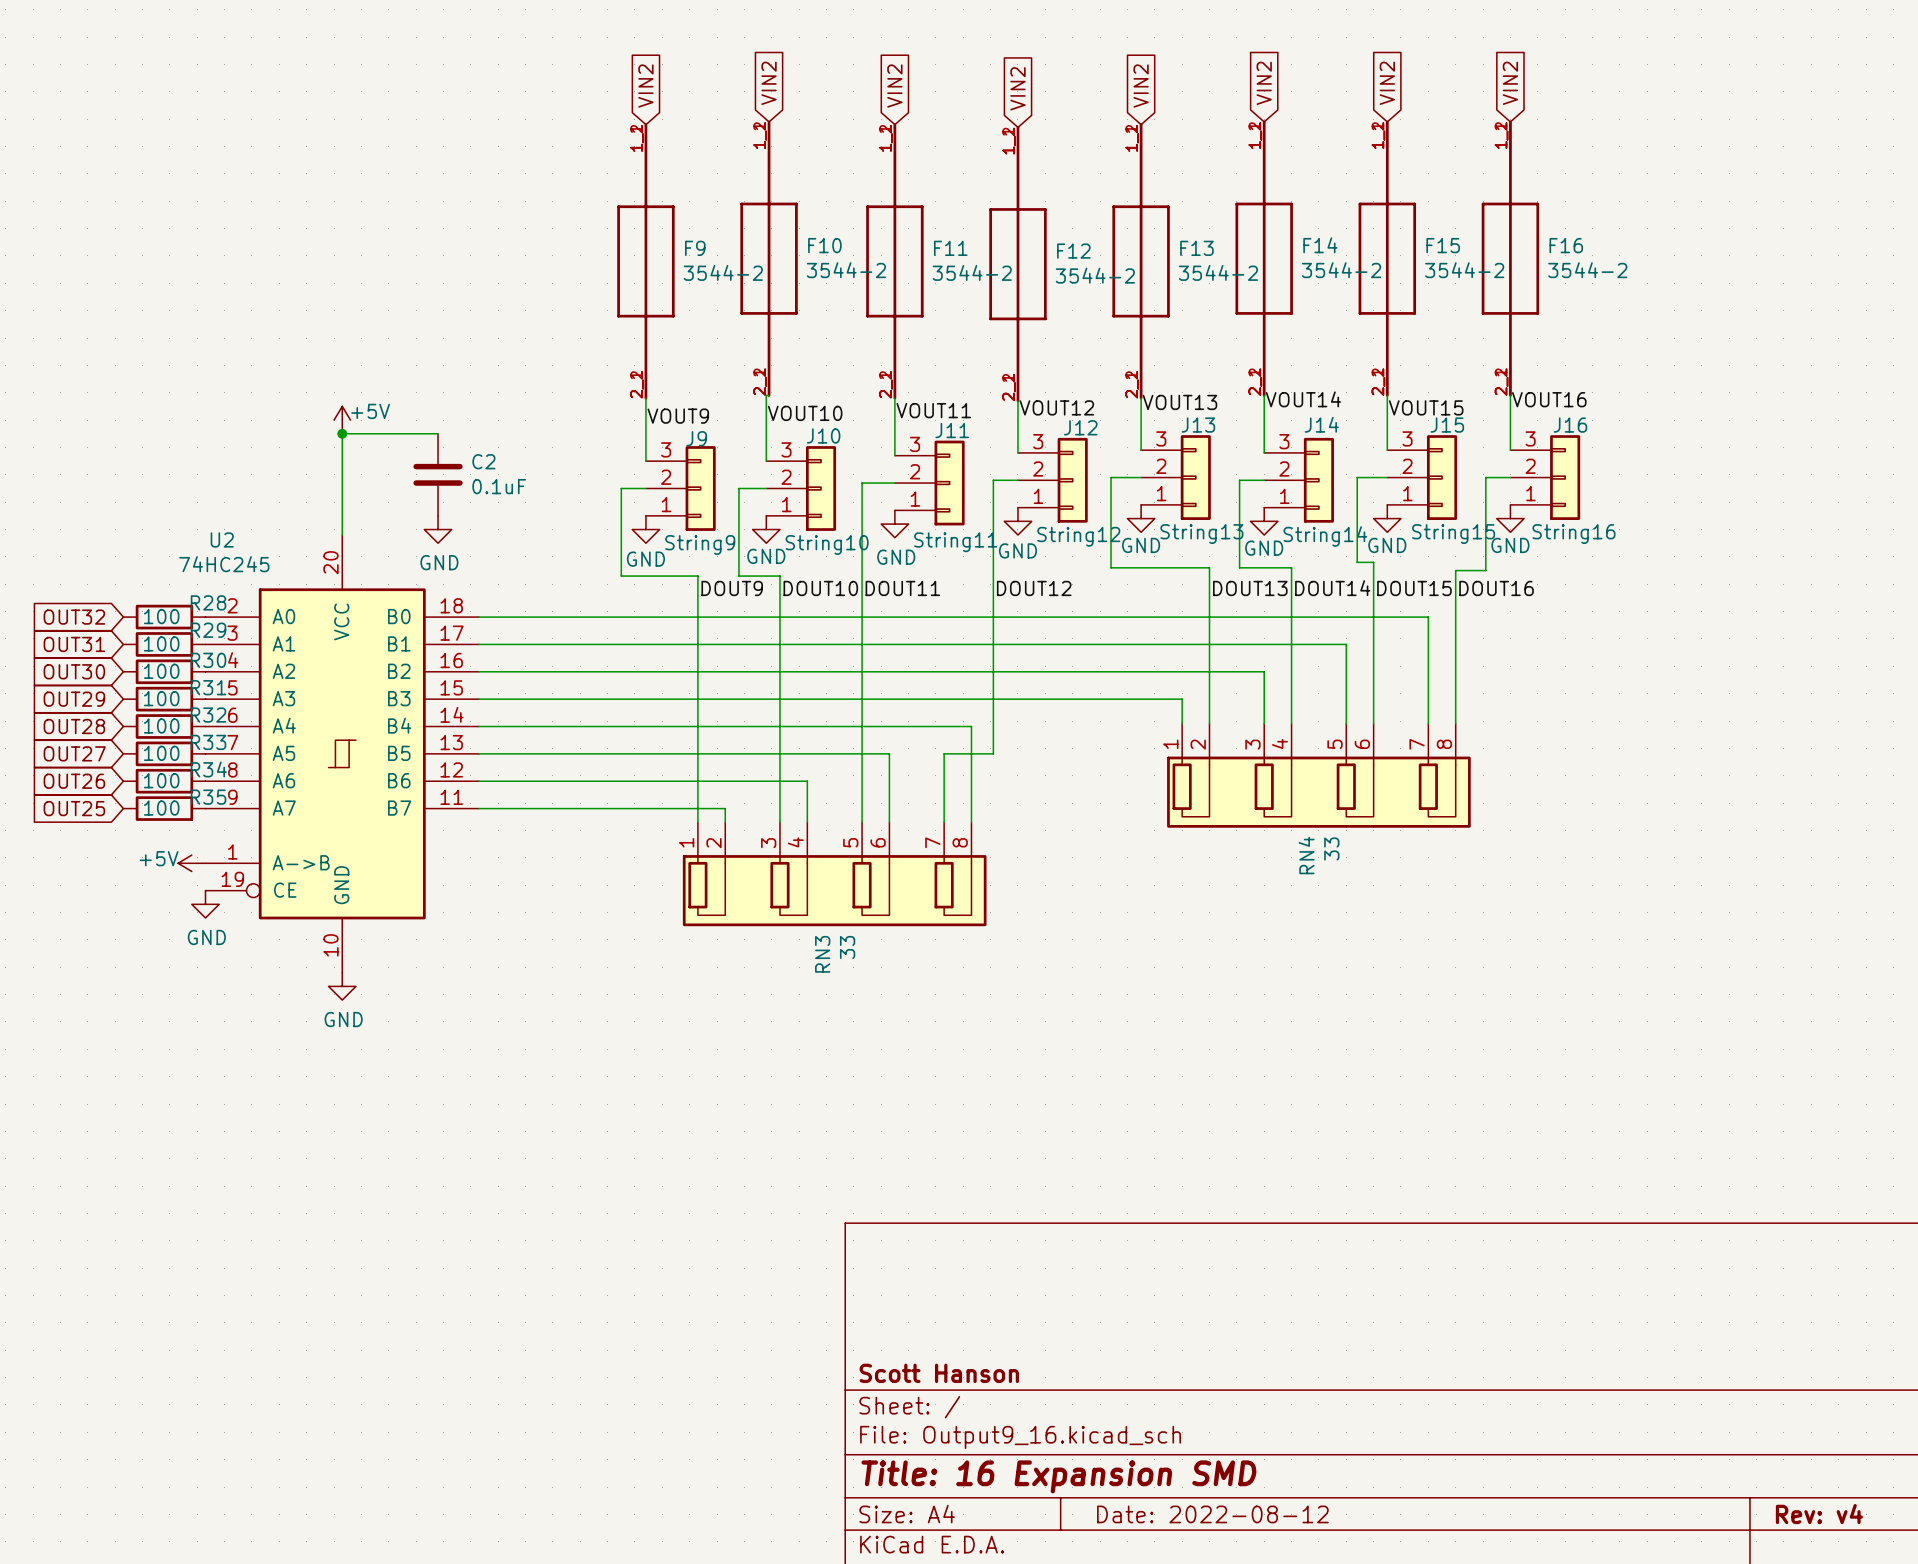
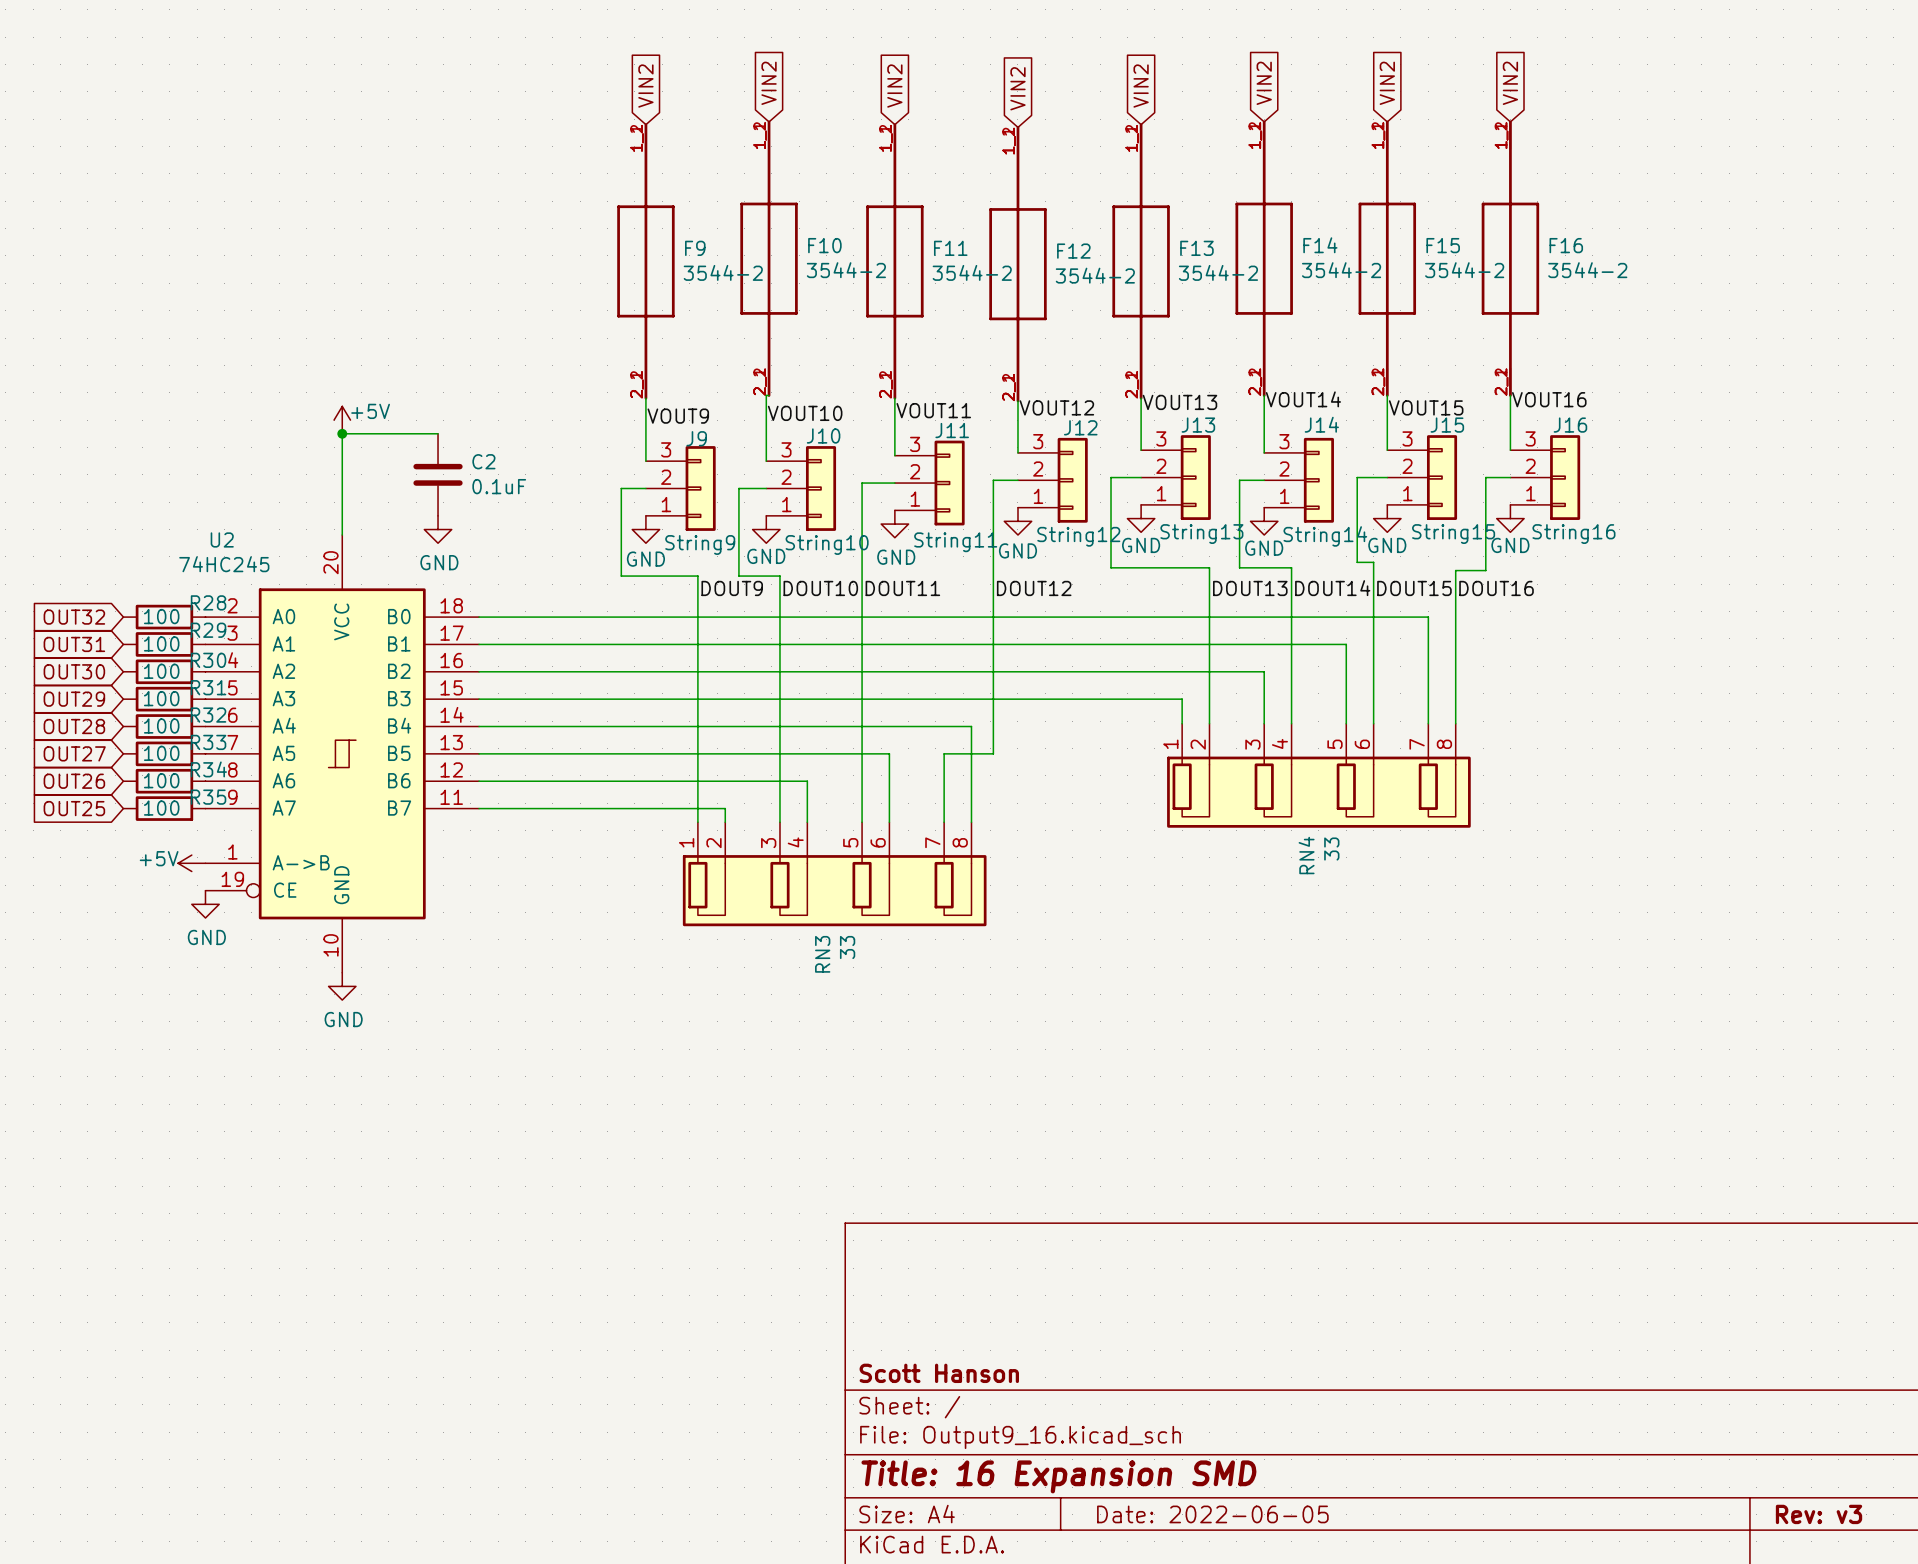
title block: Date: 2022-08-12 (1212, 1514) -> Date: 2022-06-05 (1212, 1514)
title block: Rev: v4 (1819, 1514) -> Rev: v3 (1819, 1514)

